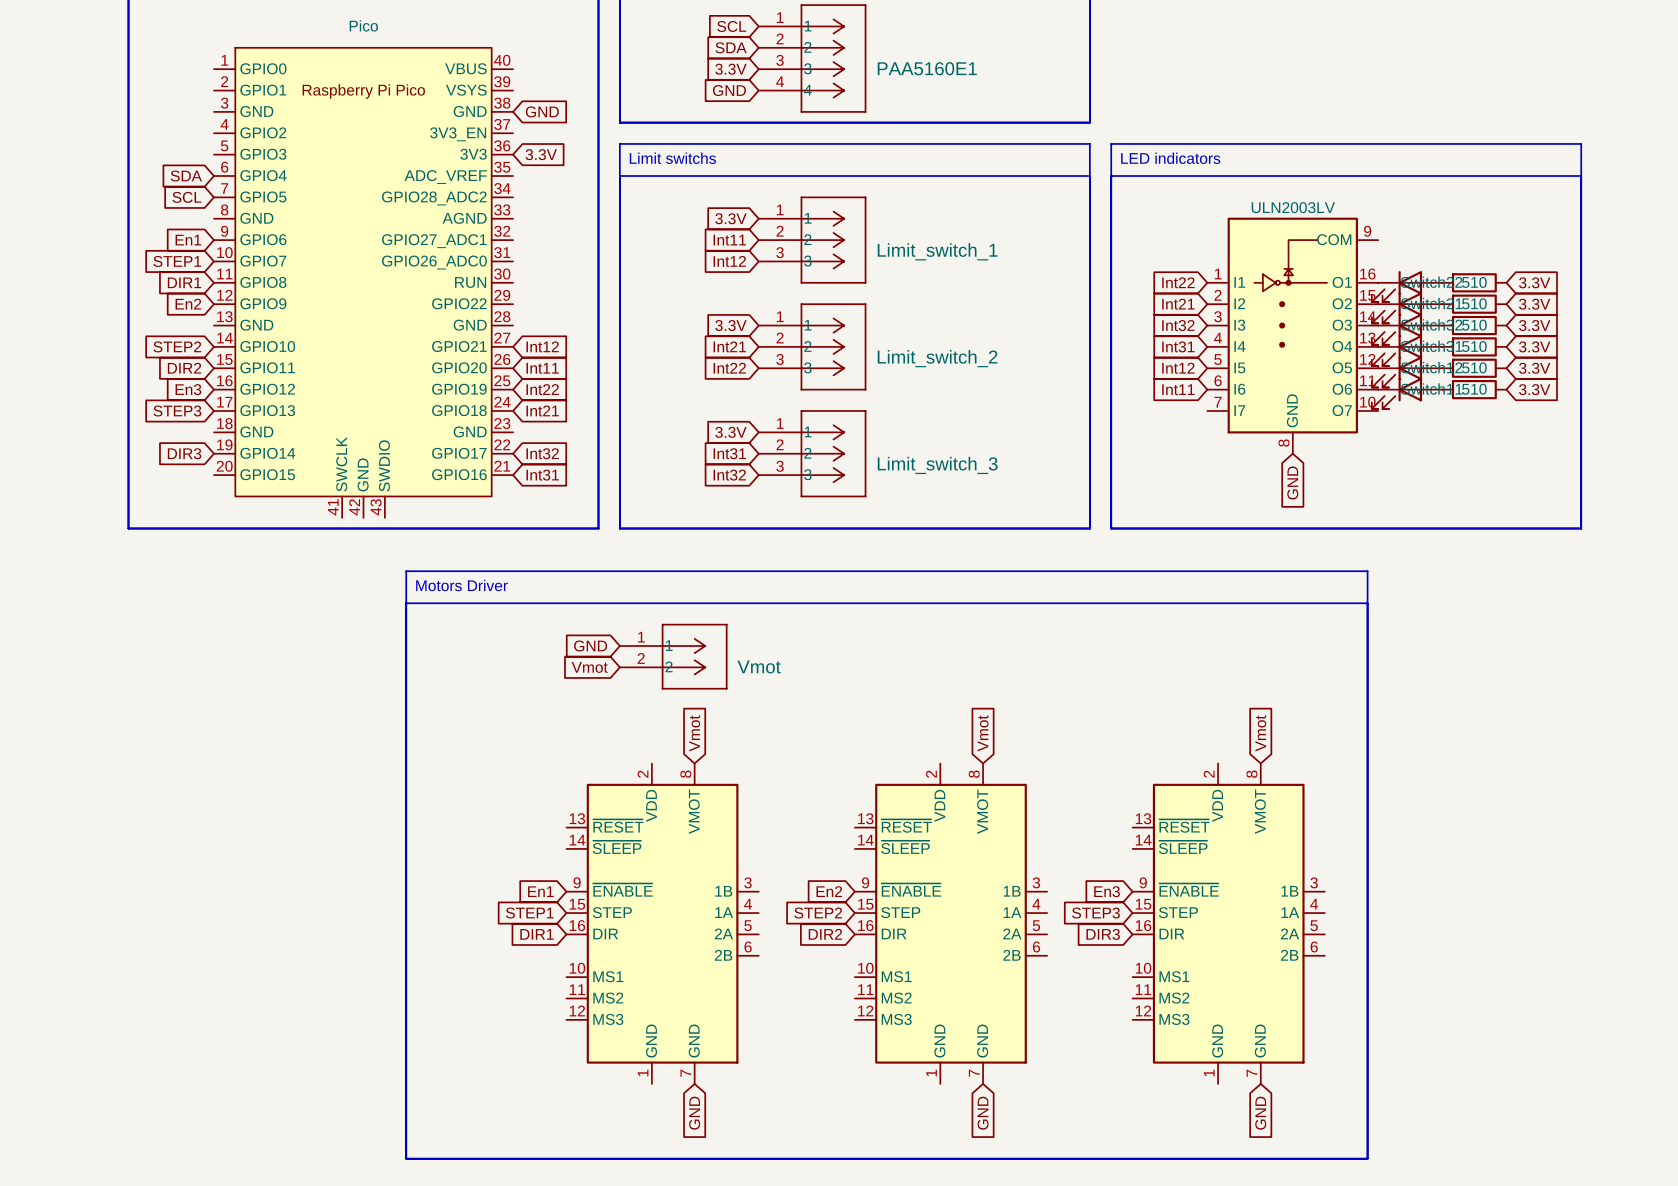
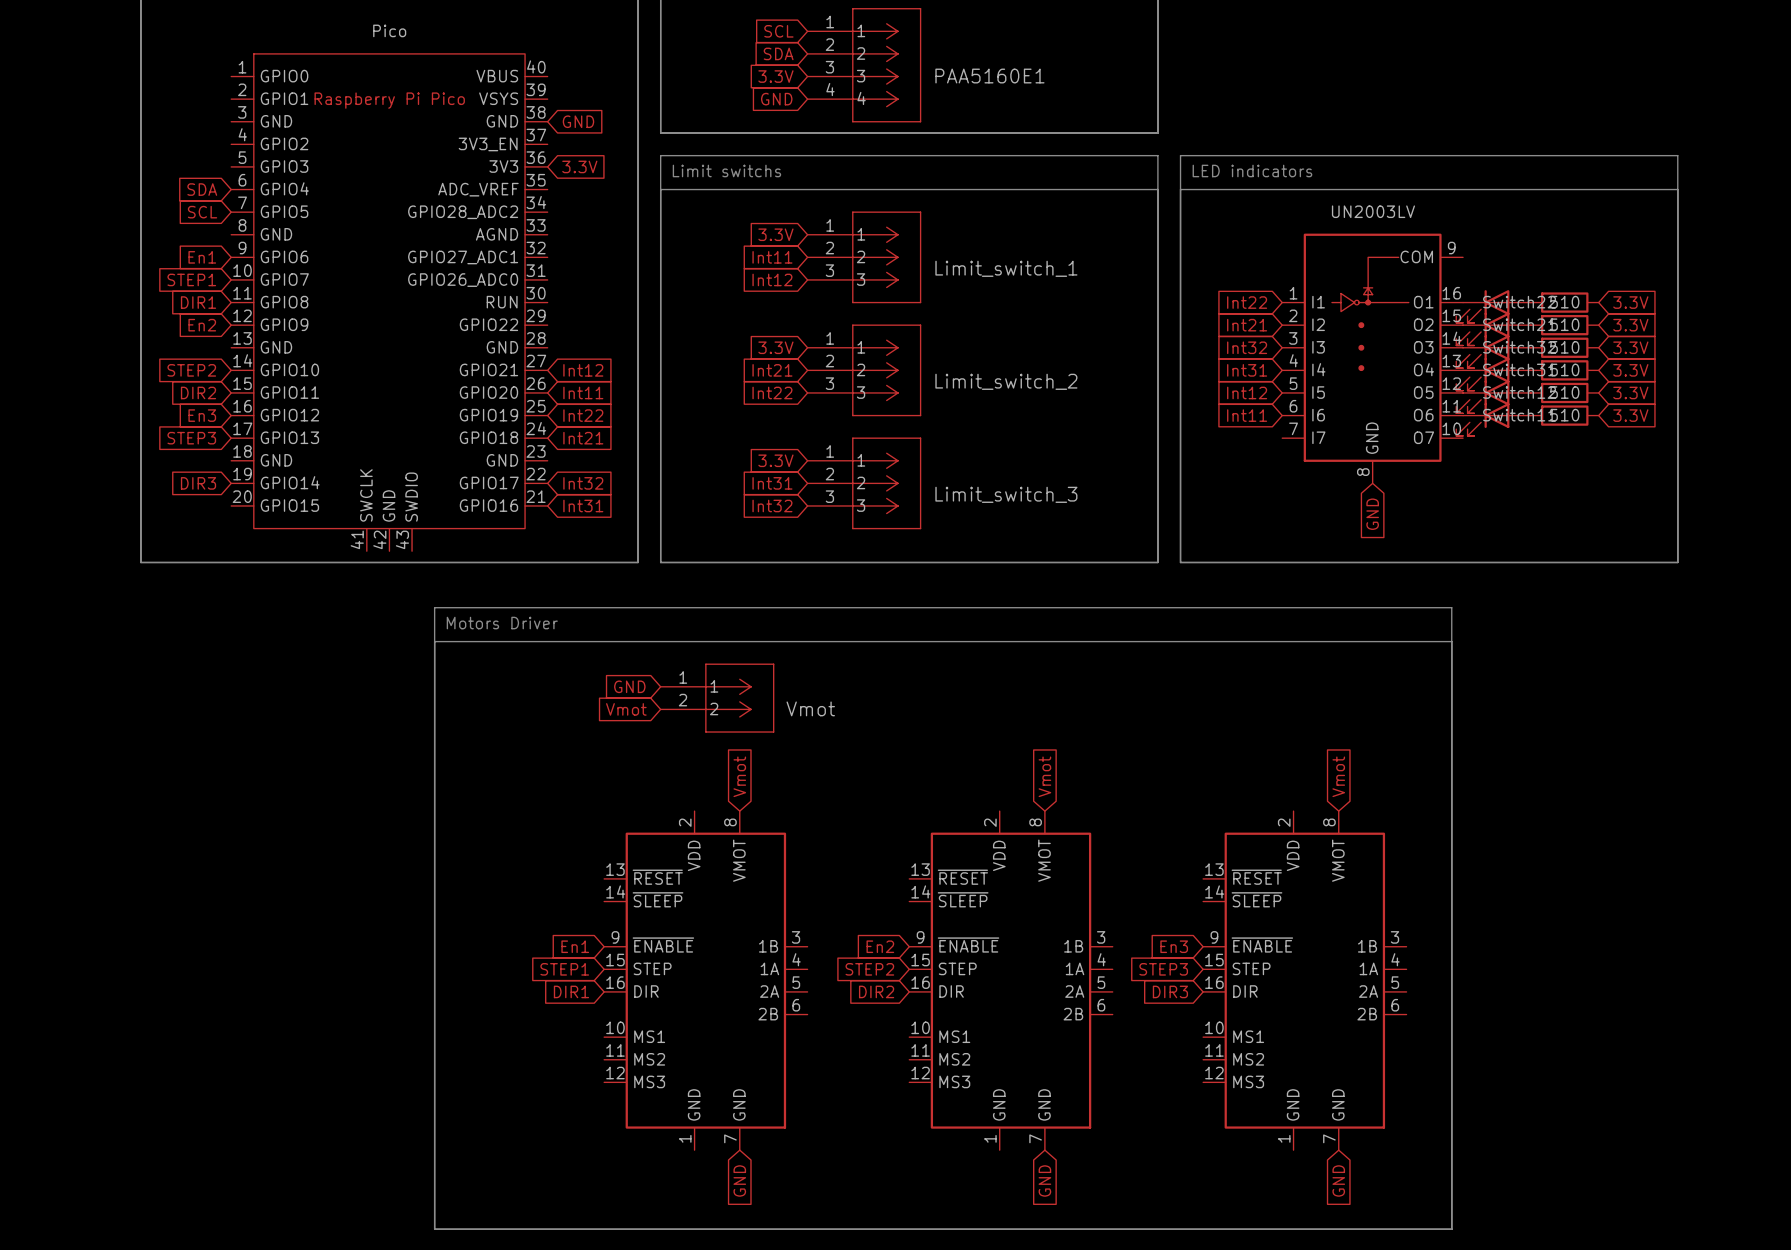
part value: ULN2003LV (1293, 207) -> UN2003LV (1373, 211)

